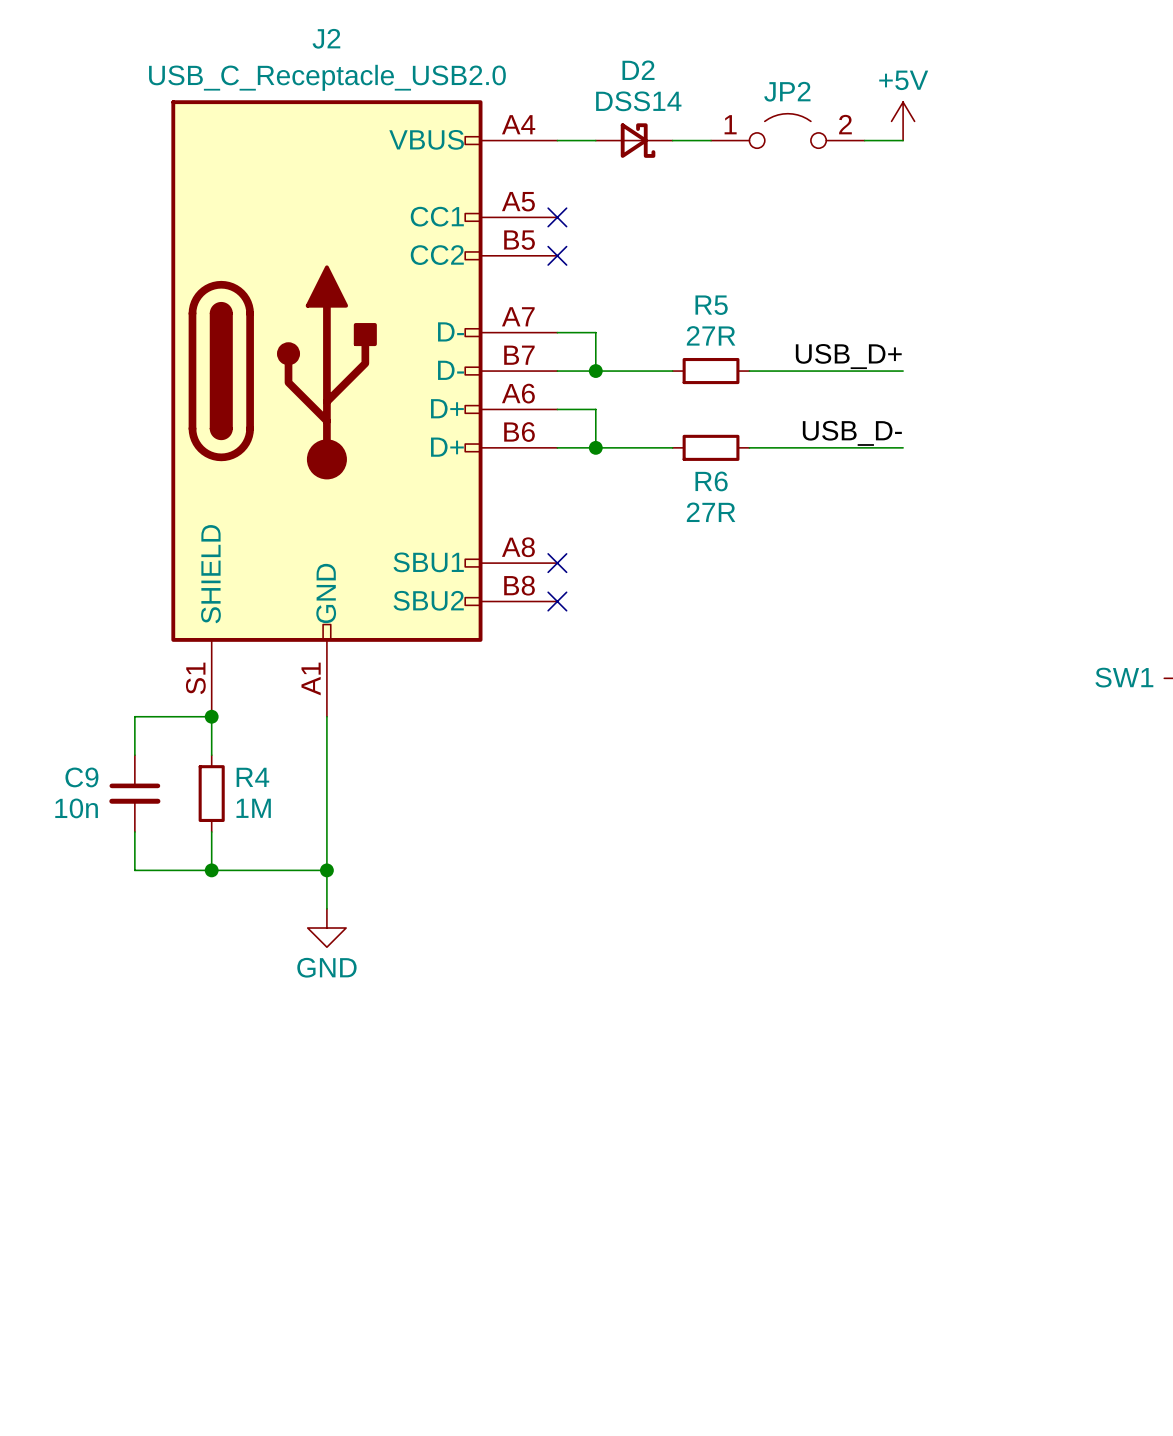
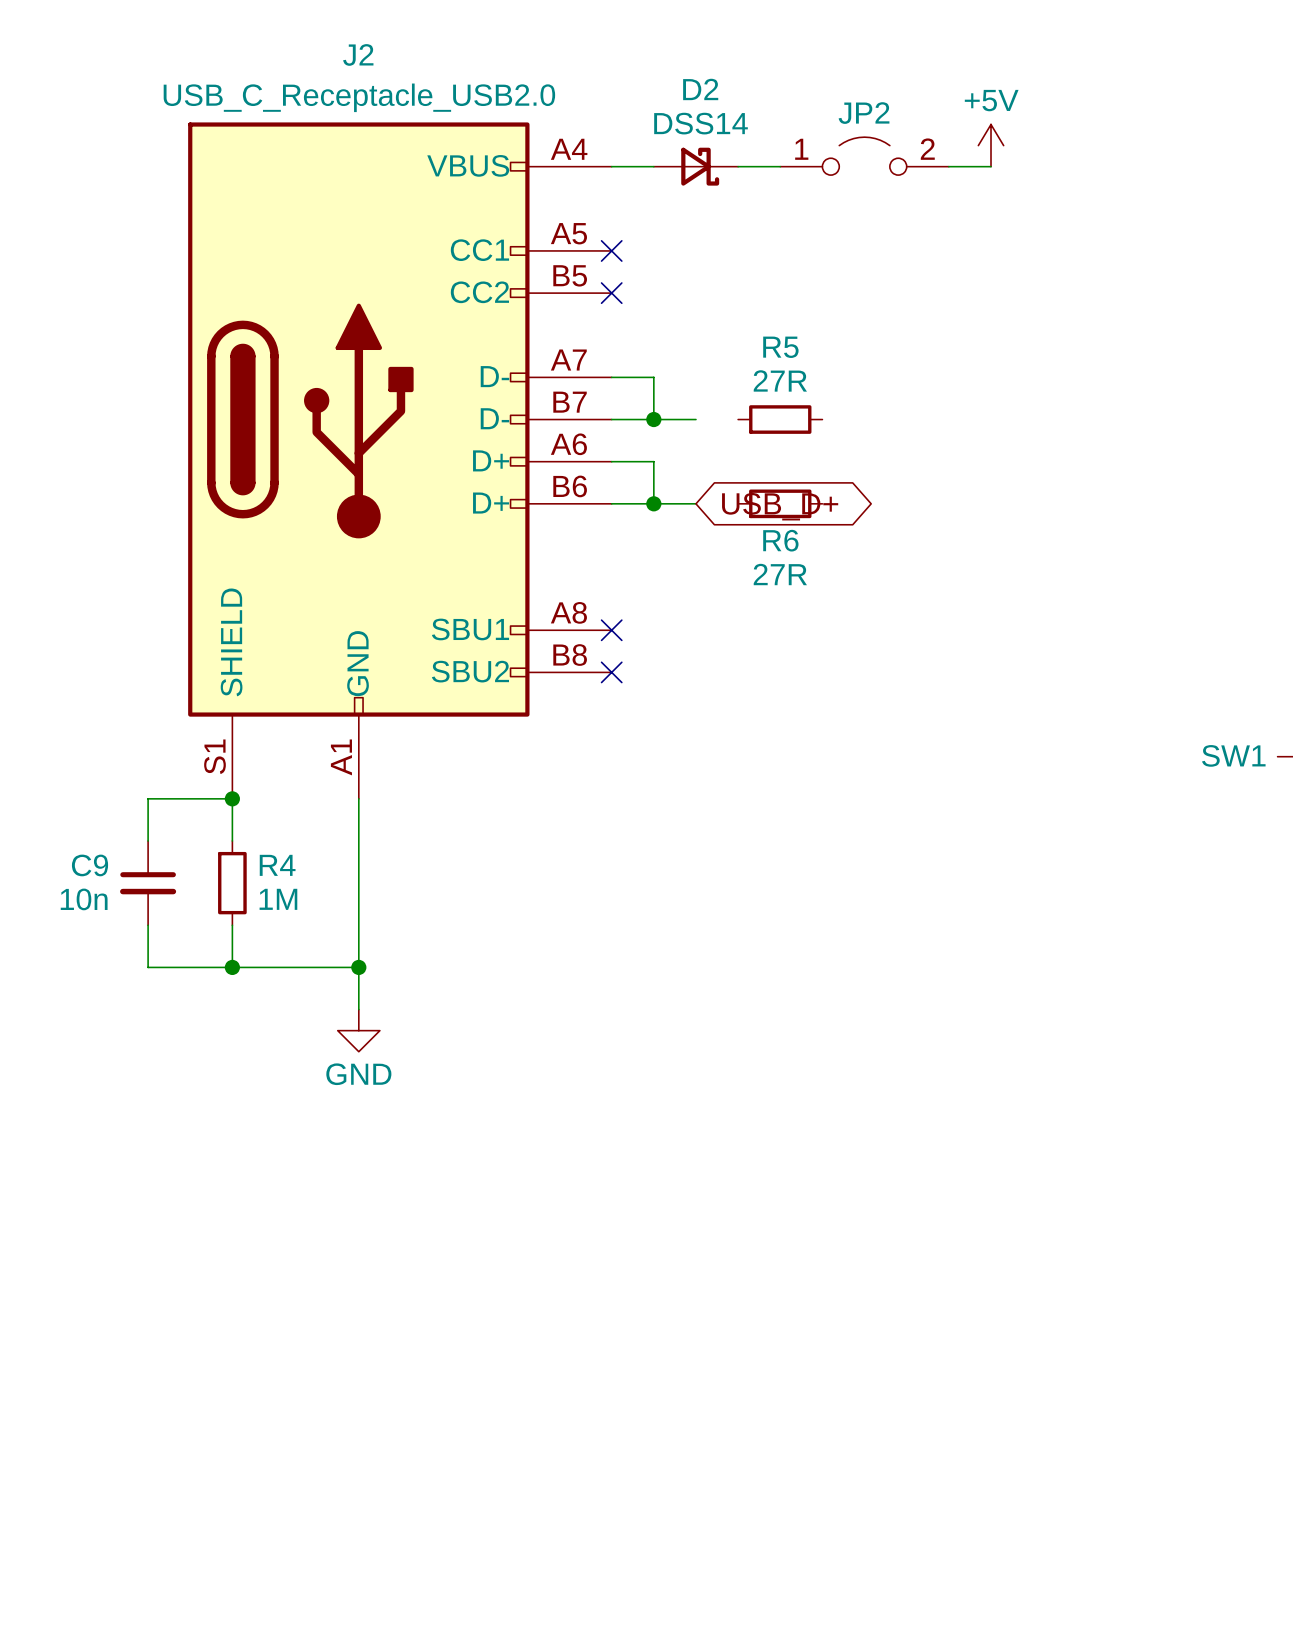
label: USB_D+ (848, 356) -> none
wire: (634, 371) (672, 371) -> none
wire: (749, 371) (903, 371) -> none
label: USB_D- (852, 433) -> none
wire: (634, 447) (672, 447) -> none
wire: (749, 447) (903, 447) -> none
global label: none -> USB_D+ (780, 506)

